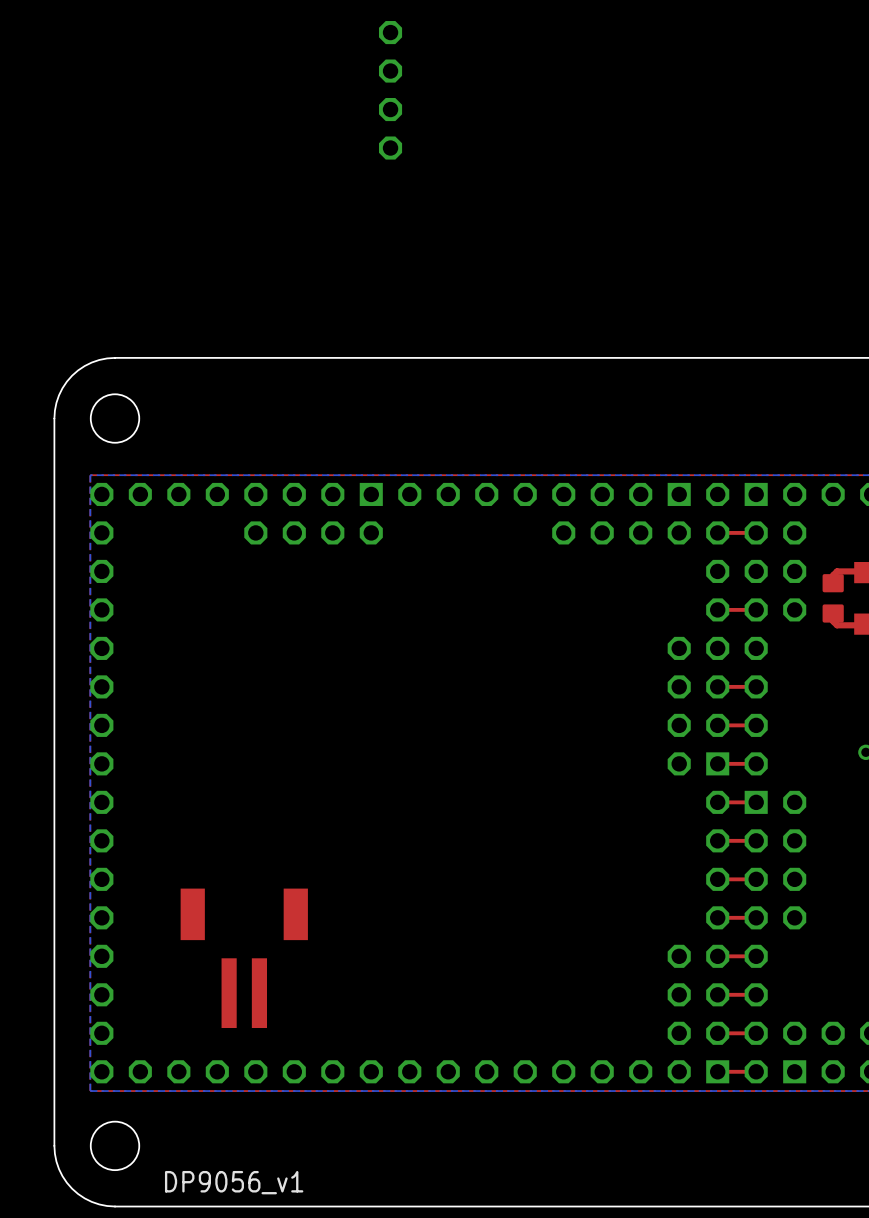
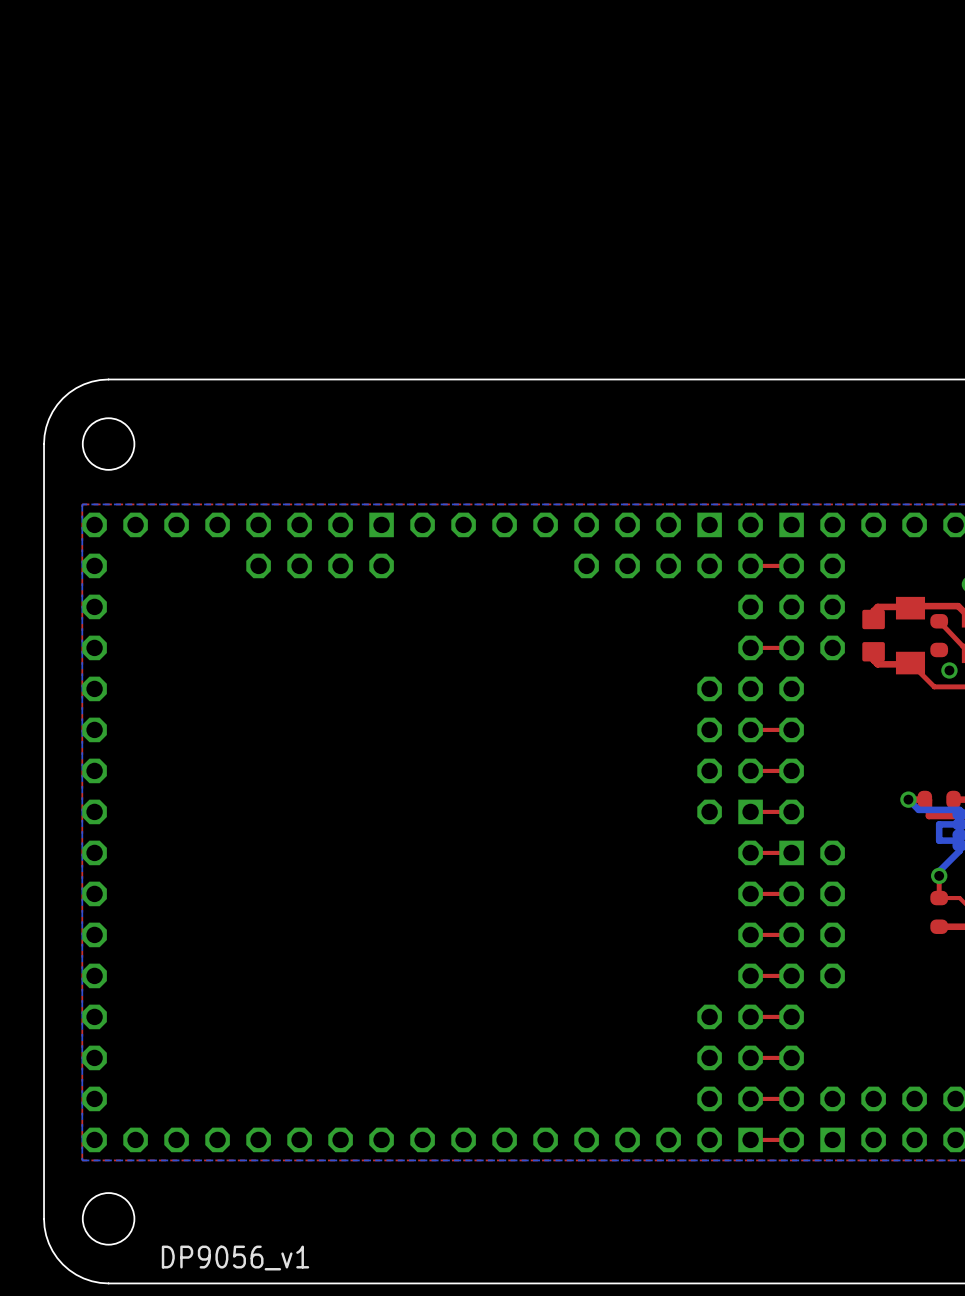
part: (390, 90) -> none
part: (244, 958) -> none

